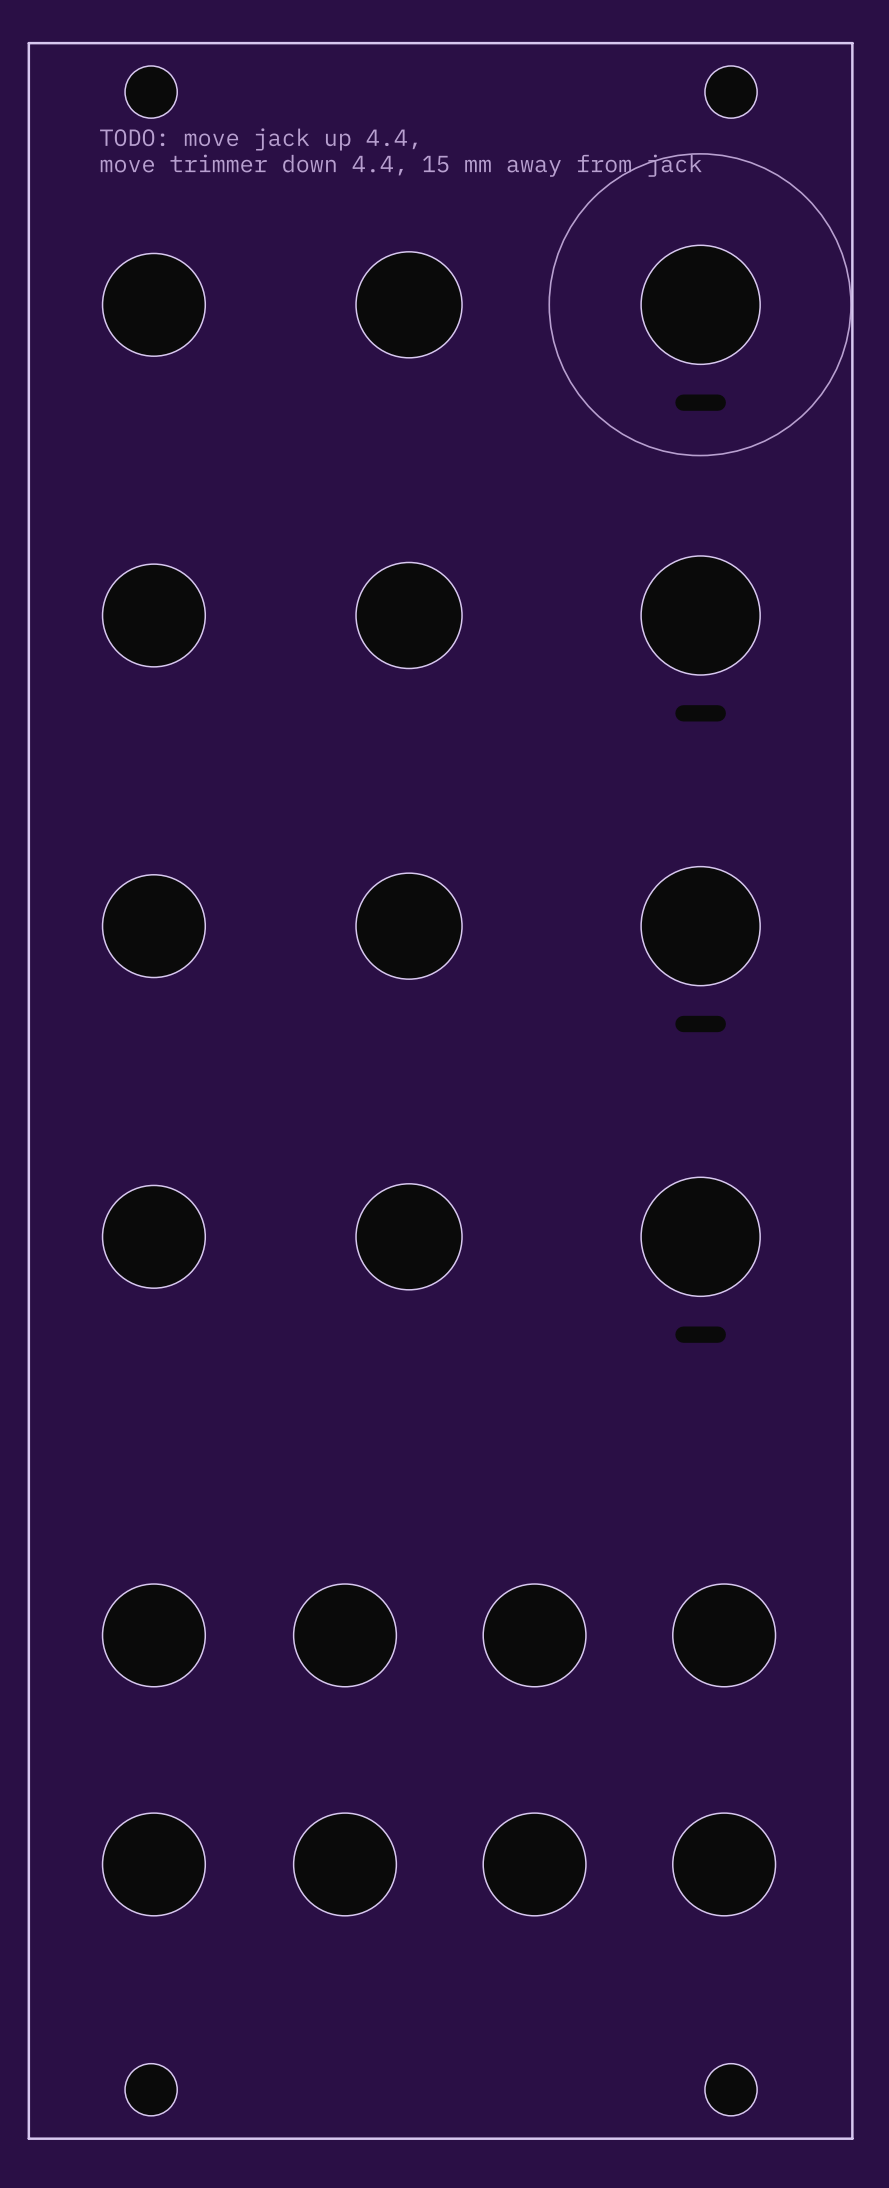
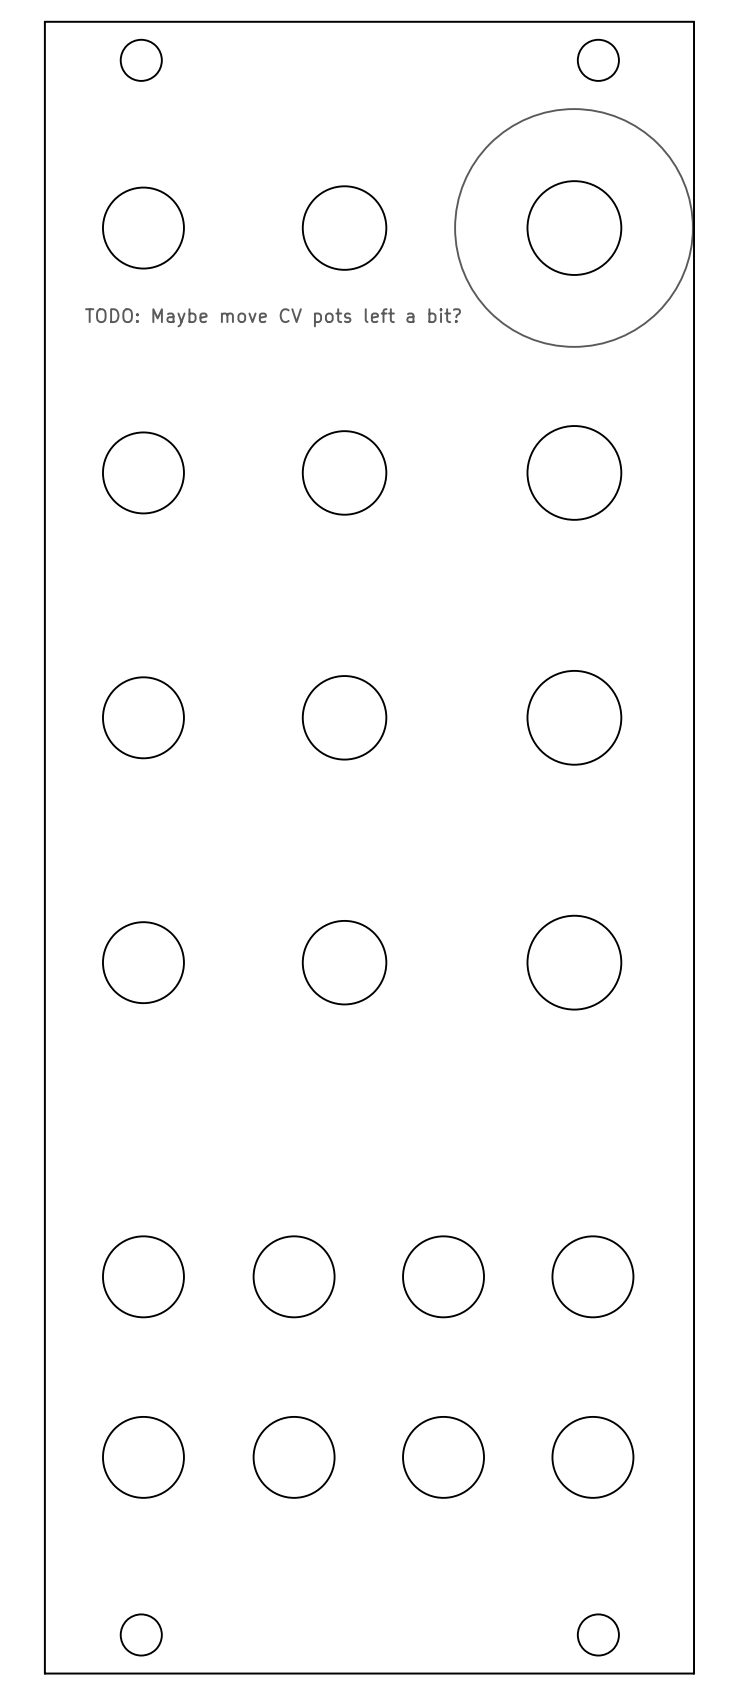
text: TODO: move jack up 4.4, (258, 139) -> none
text: move trimmer down 4.4, 15 mm away from jack (401, 165) -> none
text: none -> TODO: Maybe move CV pots left a bit? (273, 317)

